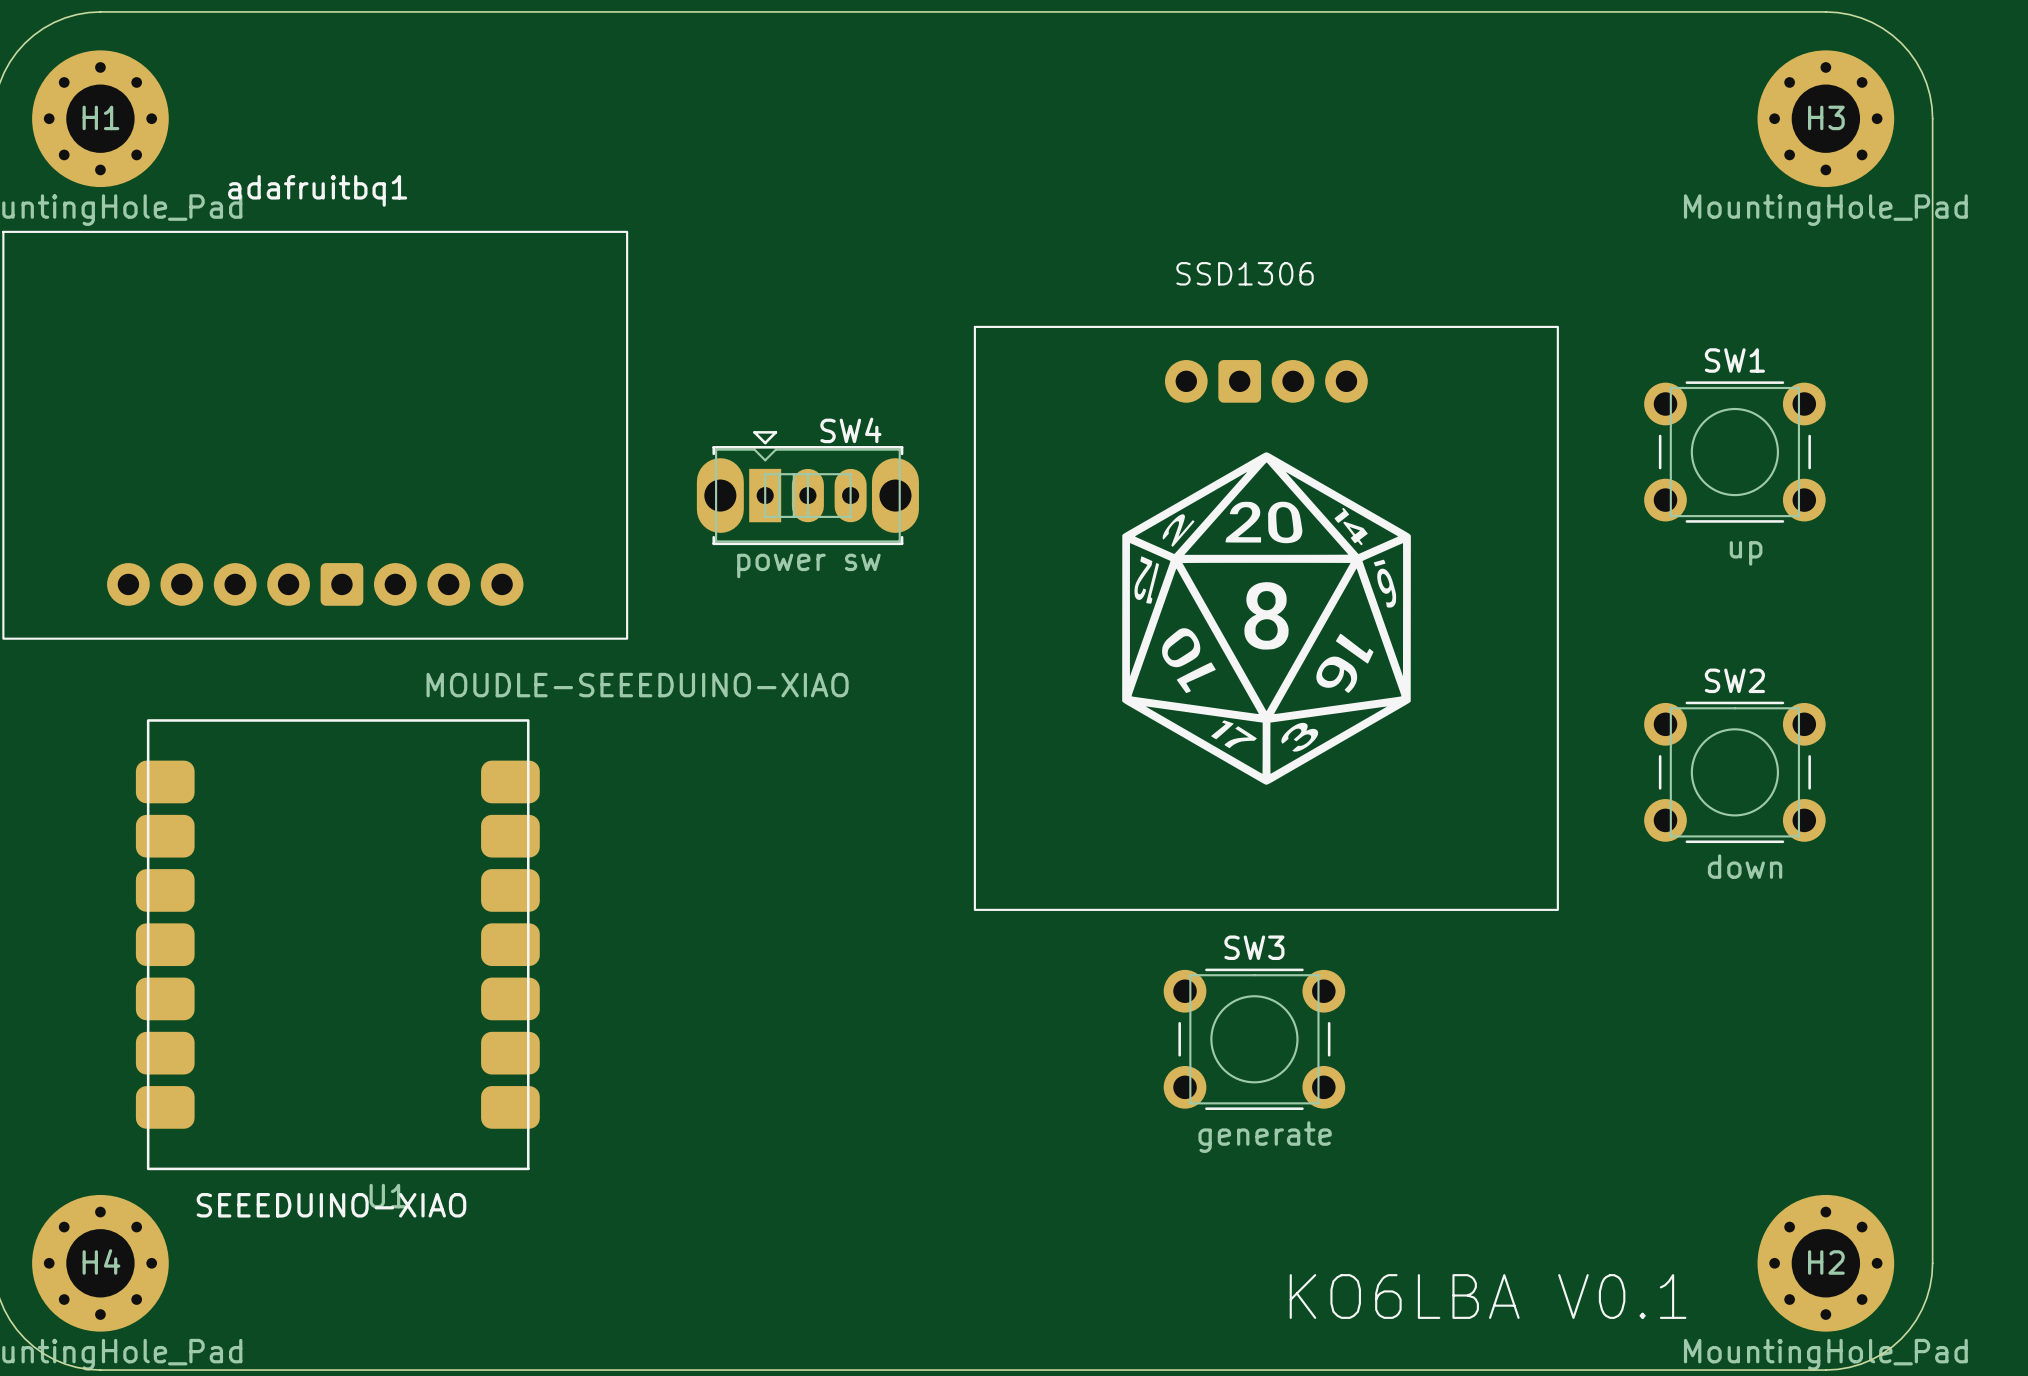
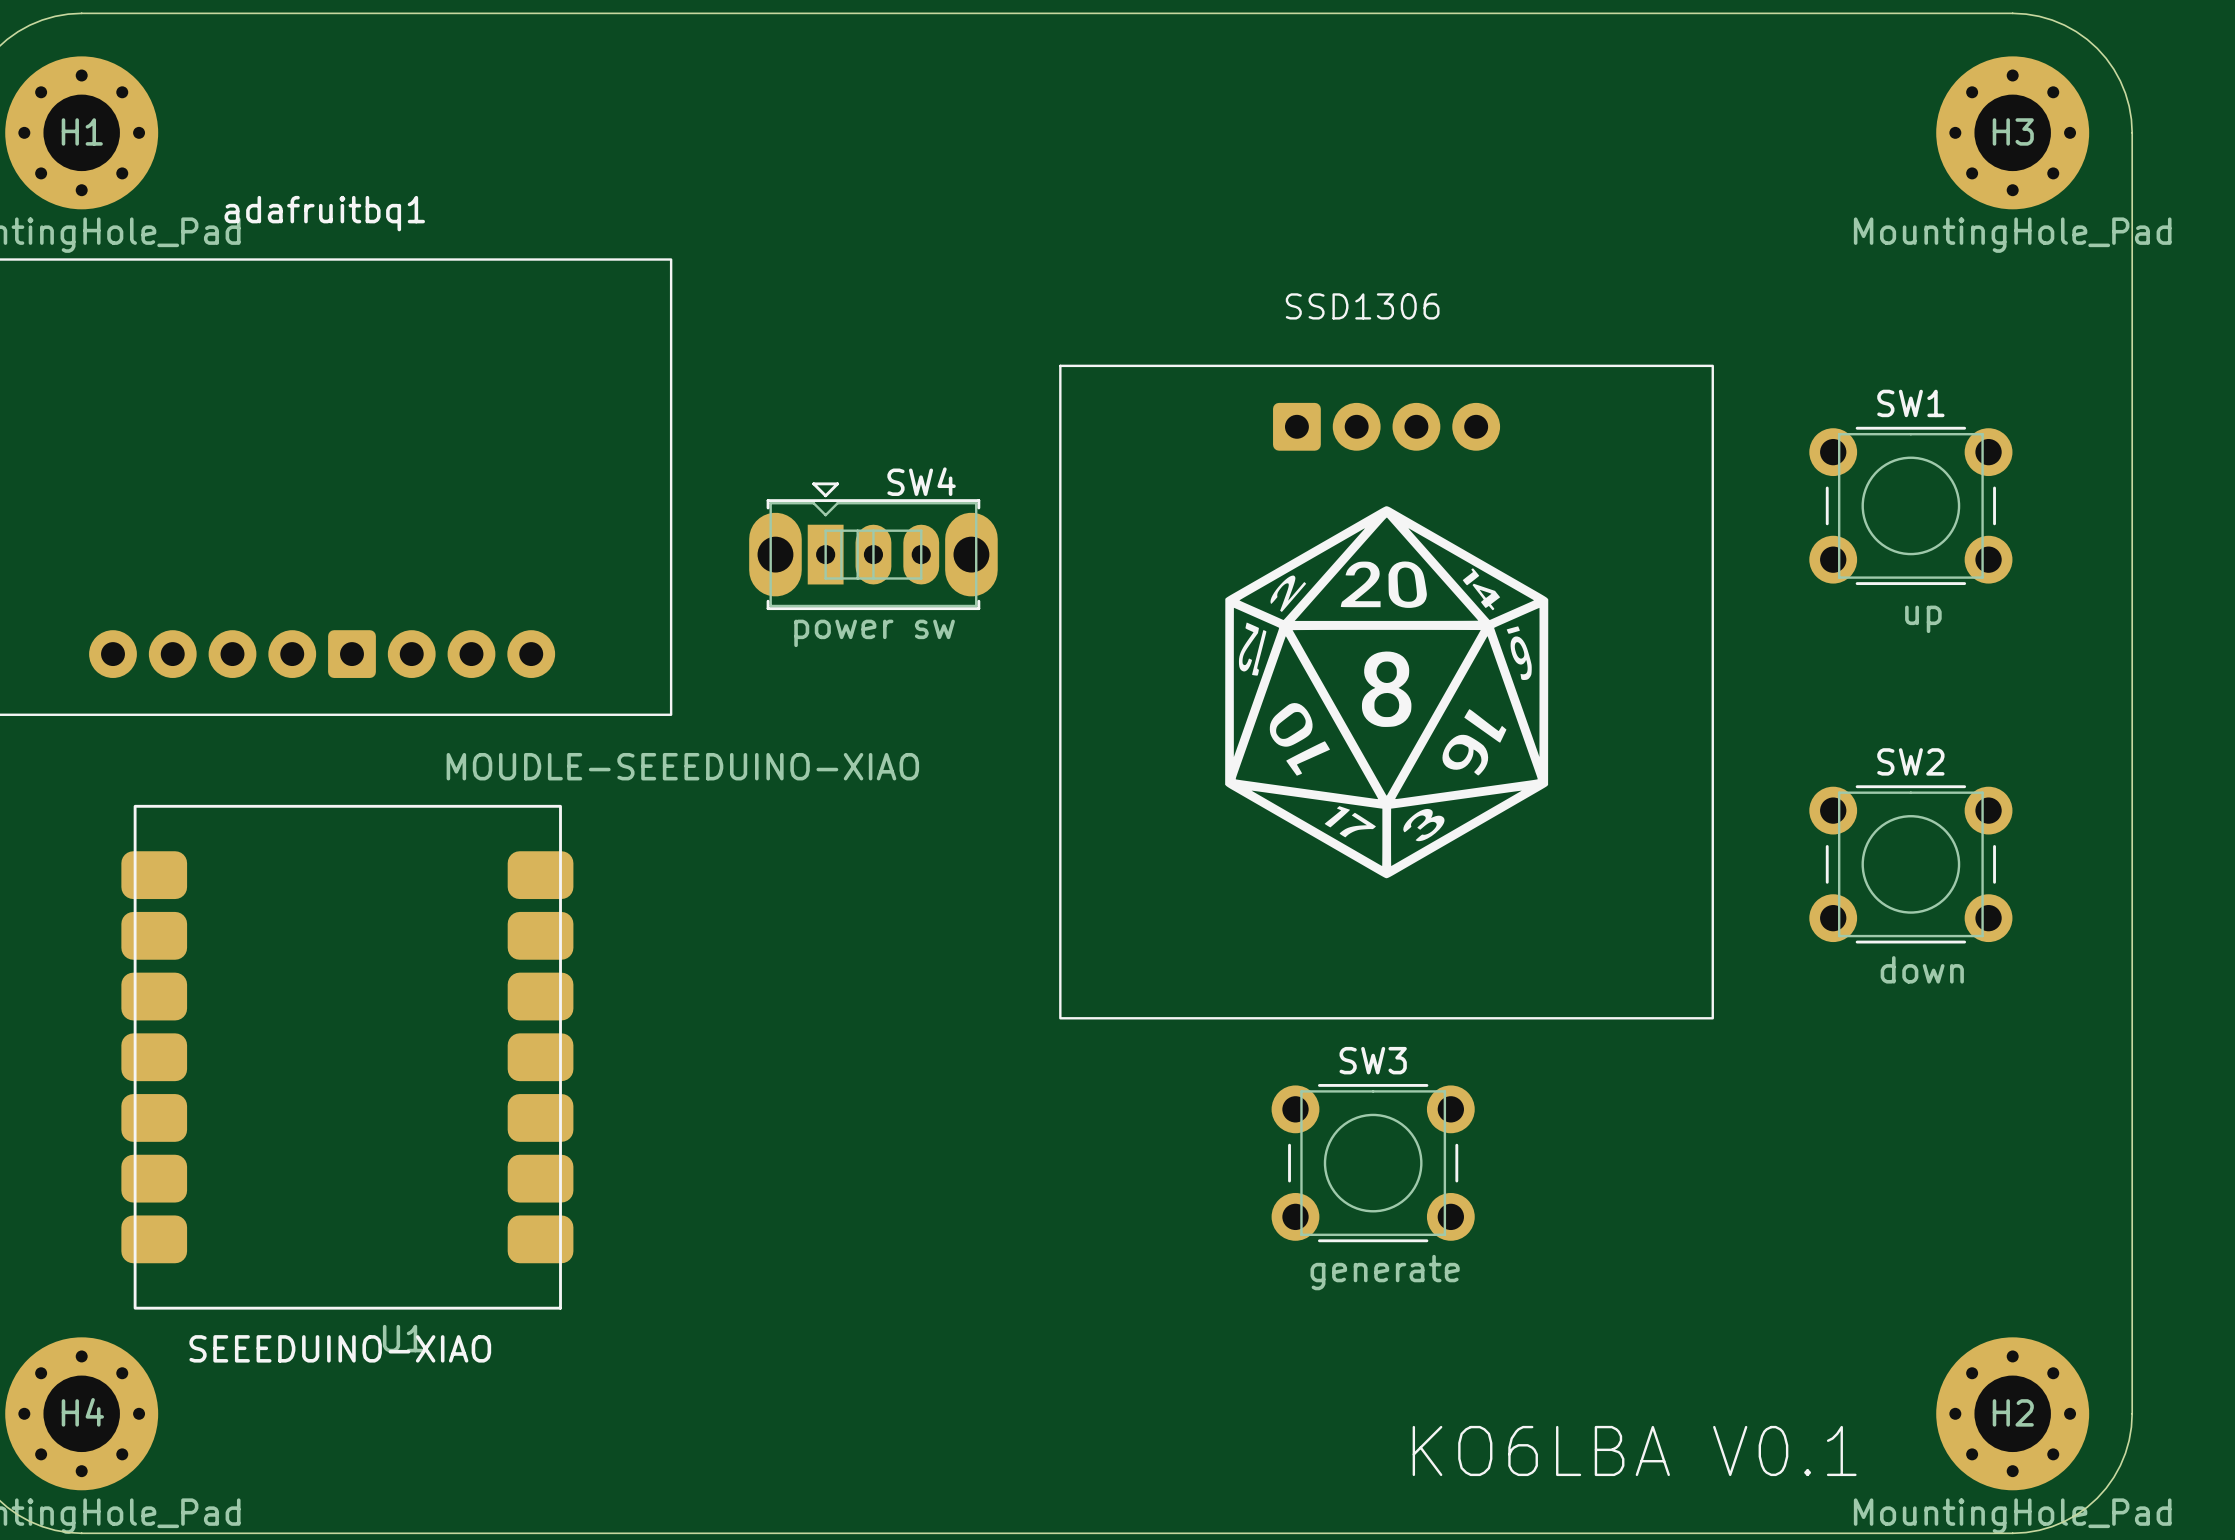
SSD1306 footprint: [973, 325, 1559, 911] -> [1059, 364, 1714, 1020]

